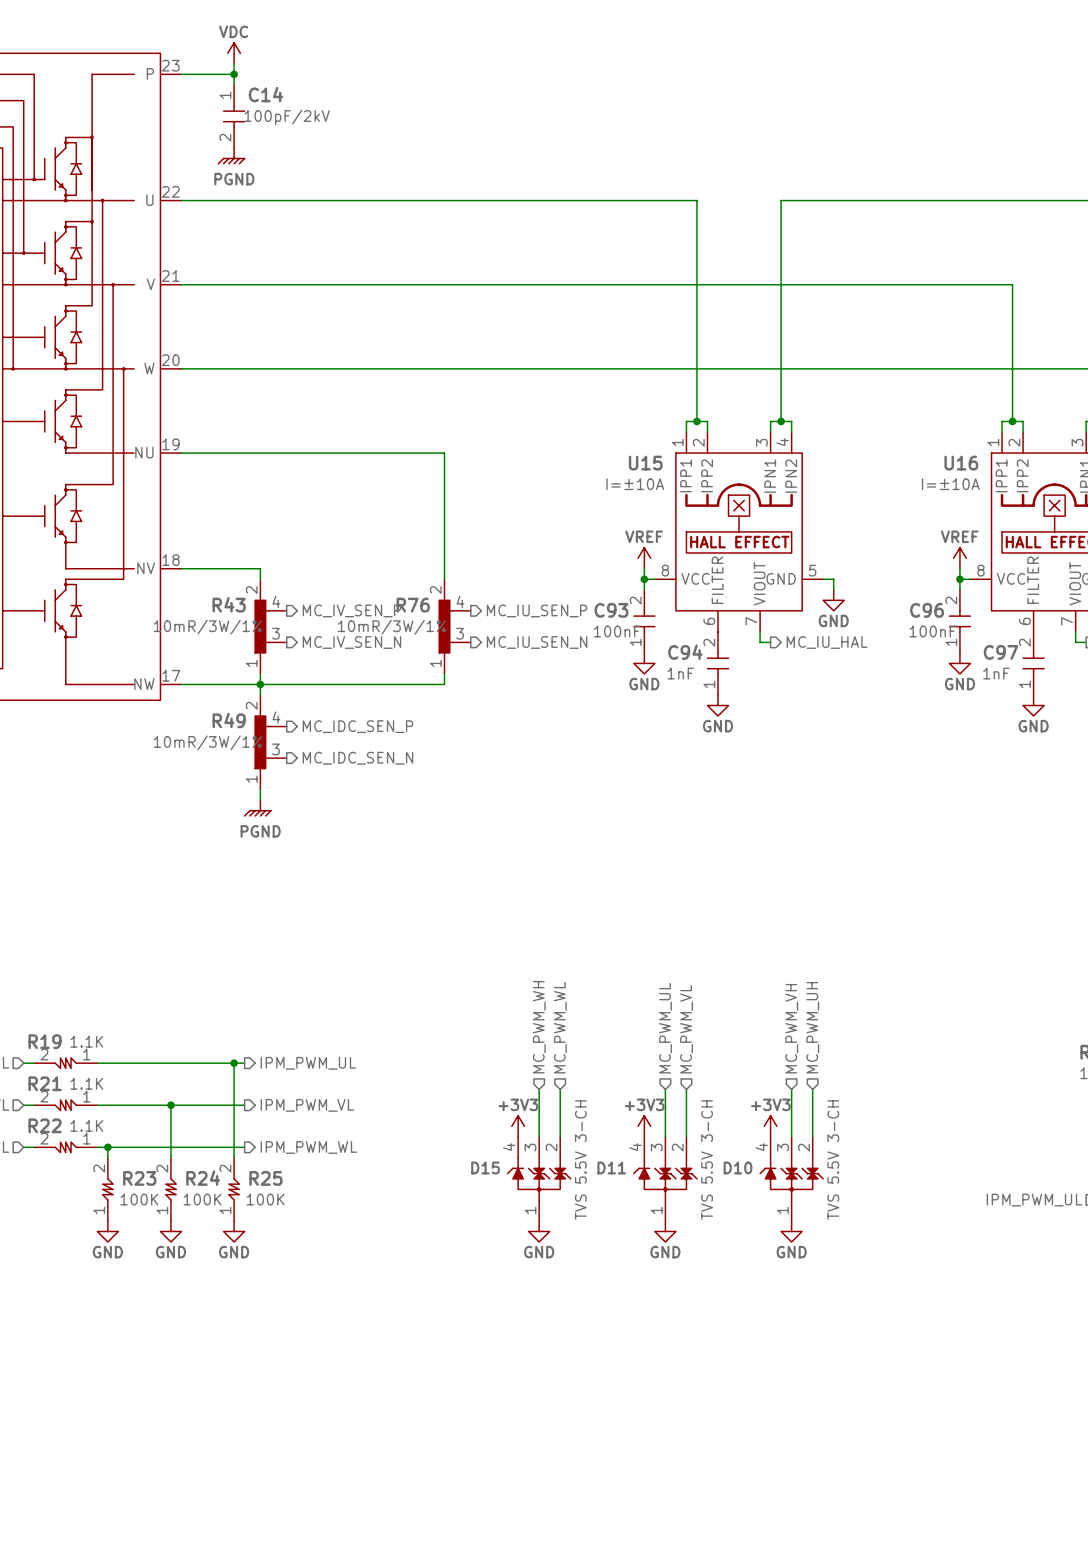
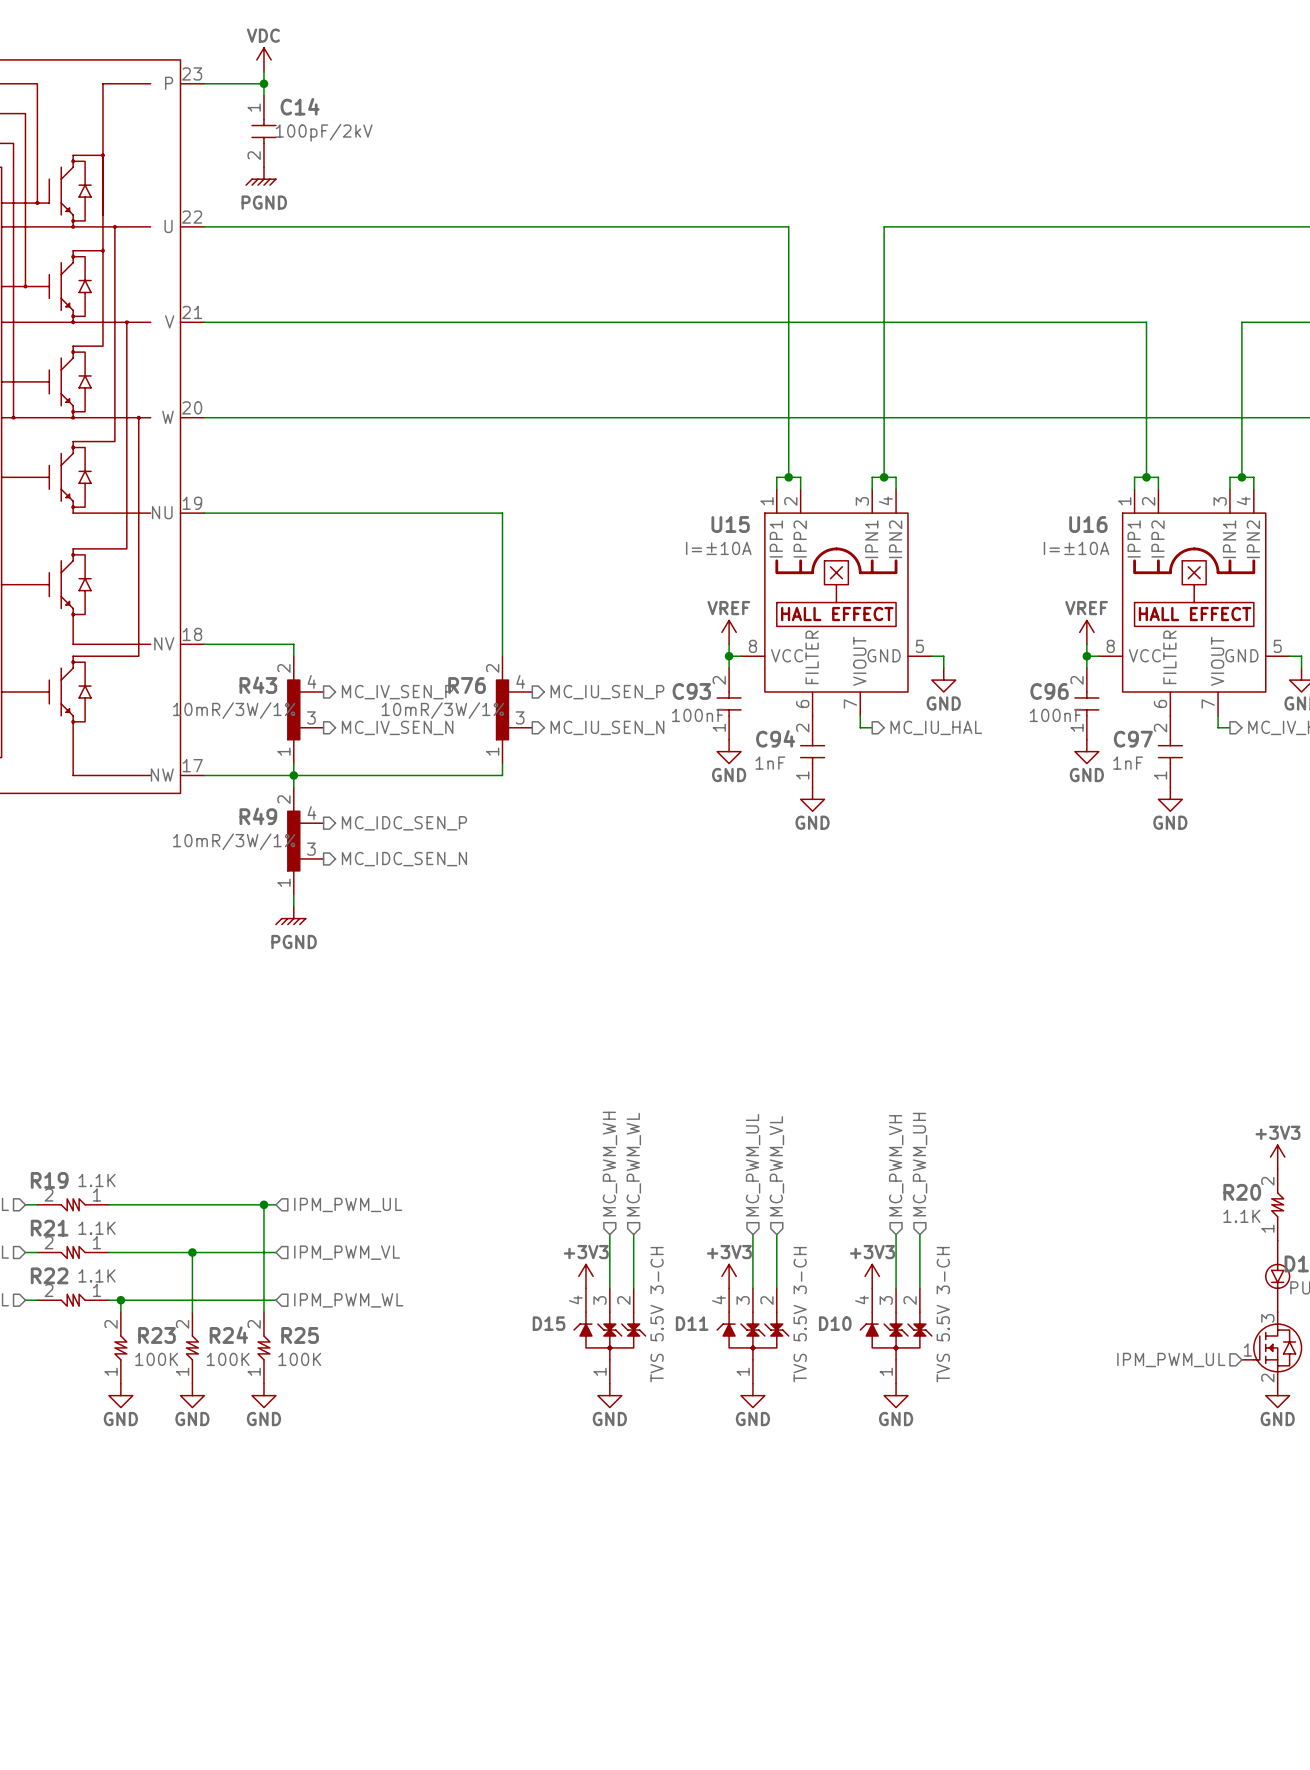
hierarchical label shape: output (308, 1063) -> input (348, 1204)
hierarchical label shape: output (307, 1105) -> input (347, 1252)
hierarchical label shape: output (308, 1147) -> input (348, 1300)

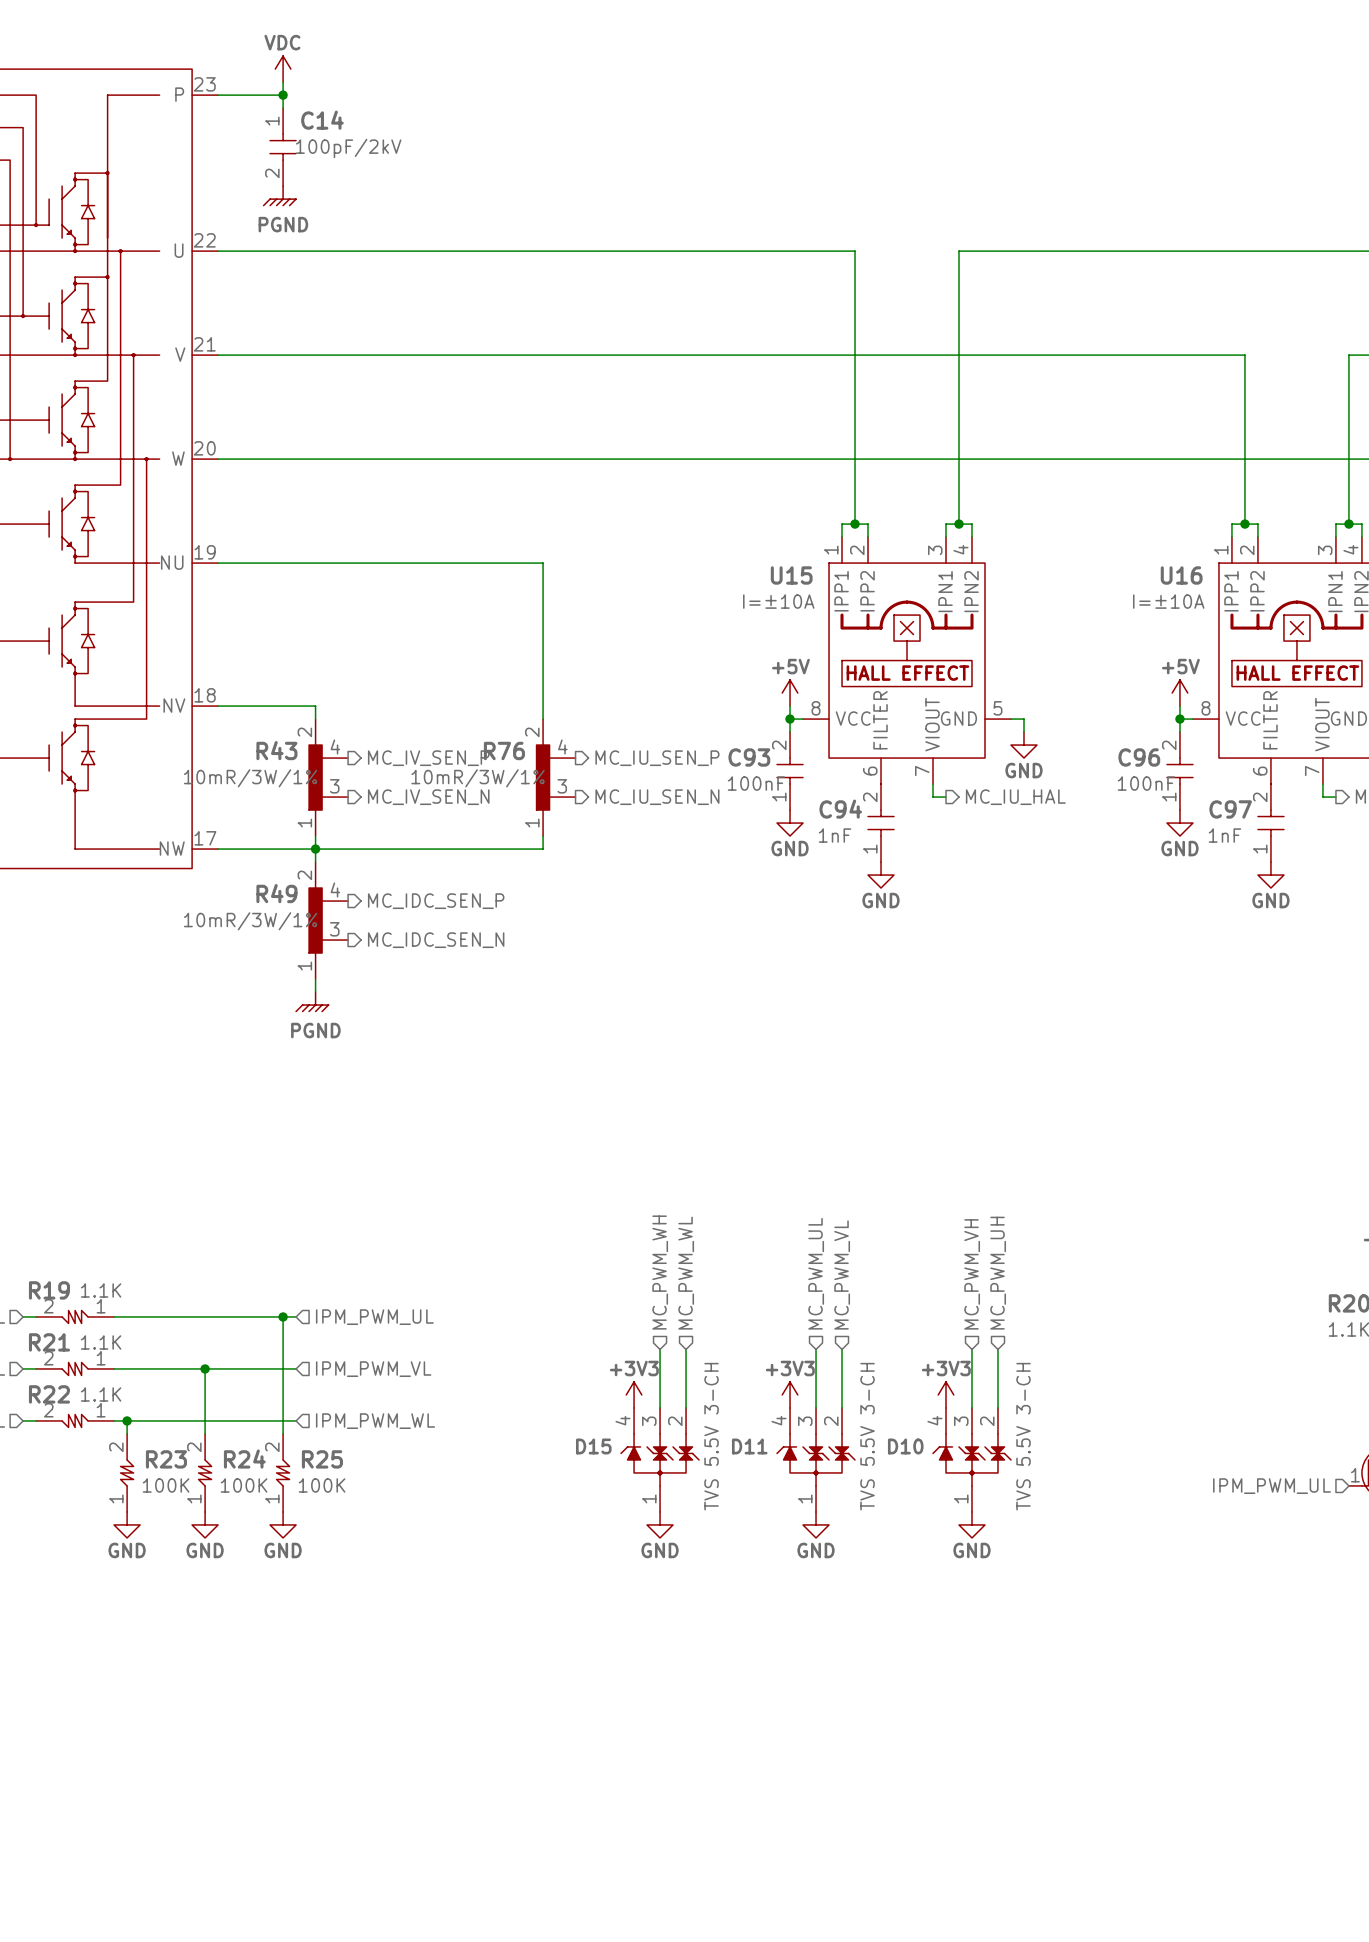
power symbol: VREF (729, 632) -> +5V (790, 693)
power symbol: VREF (1086, 632) -> +5V (1179, 693)

